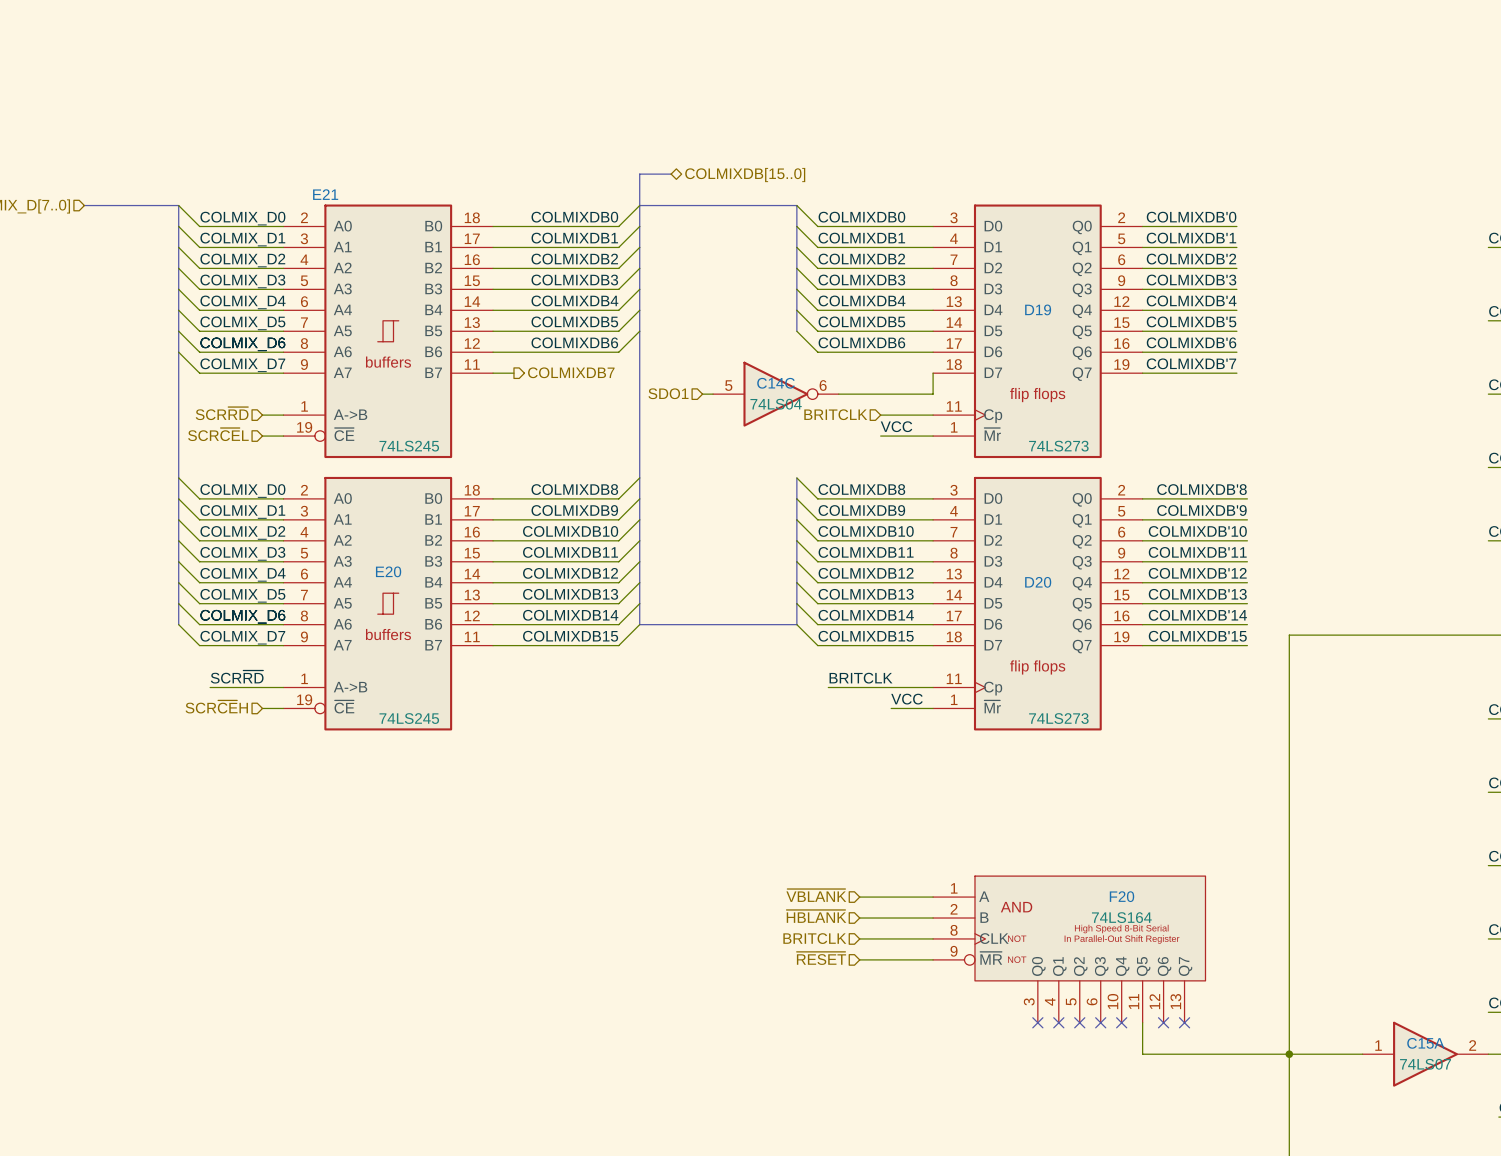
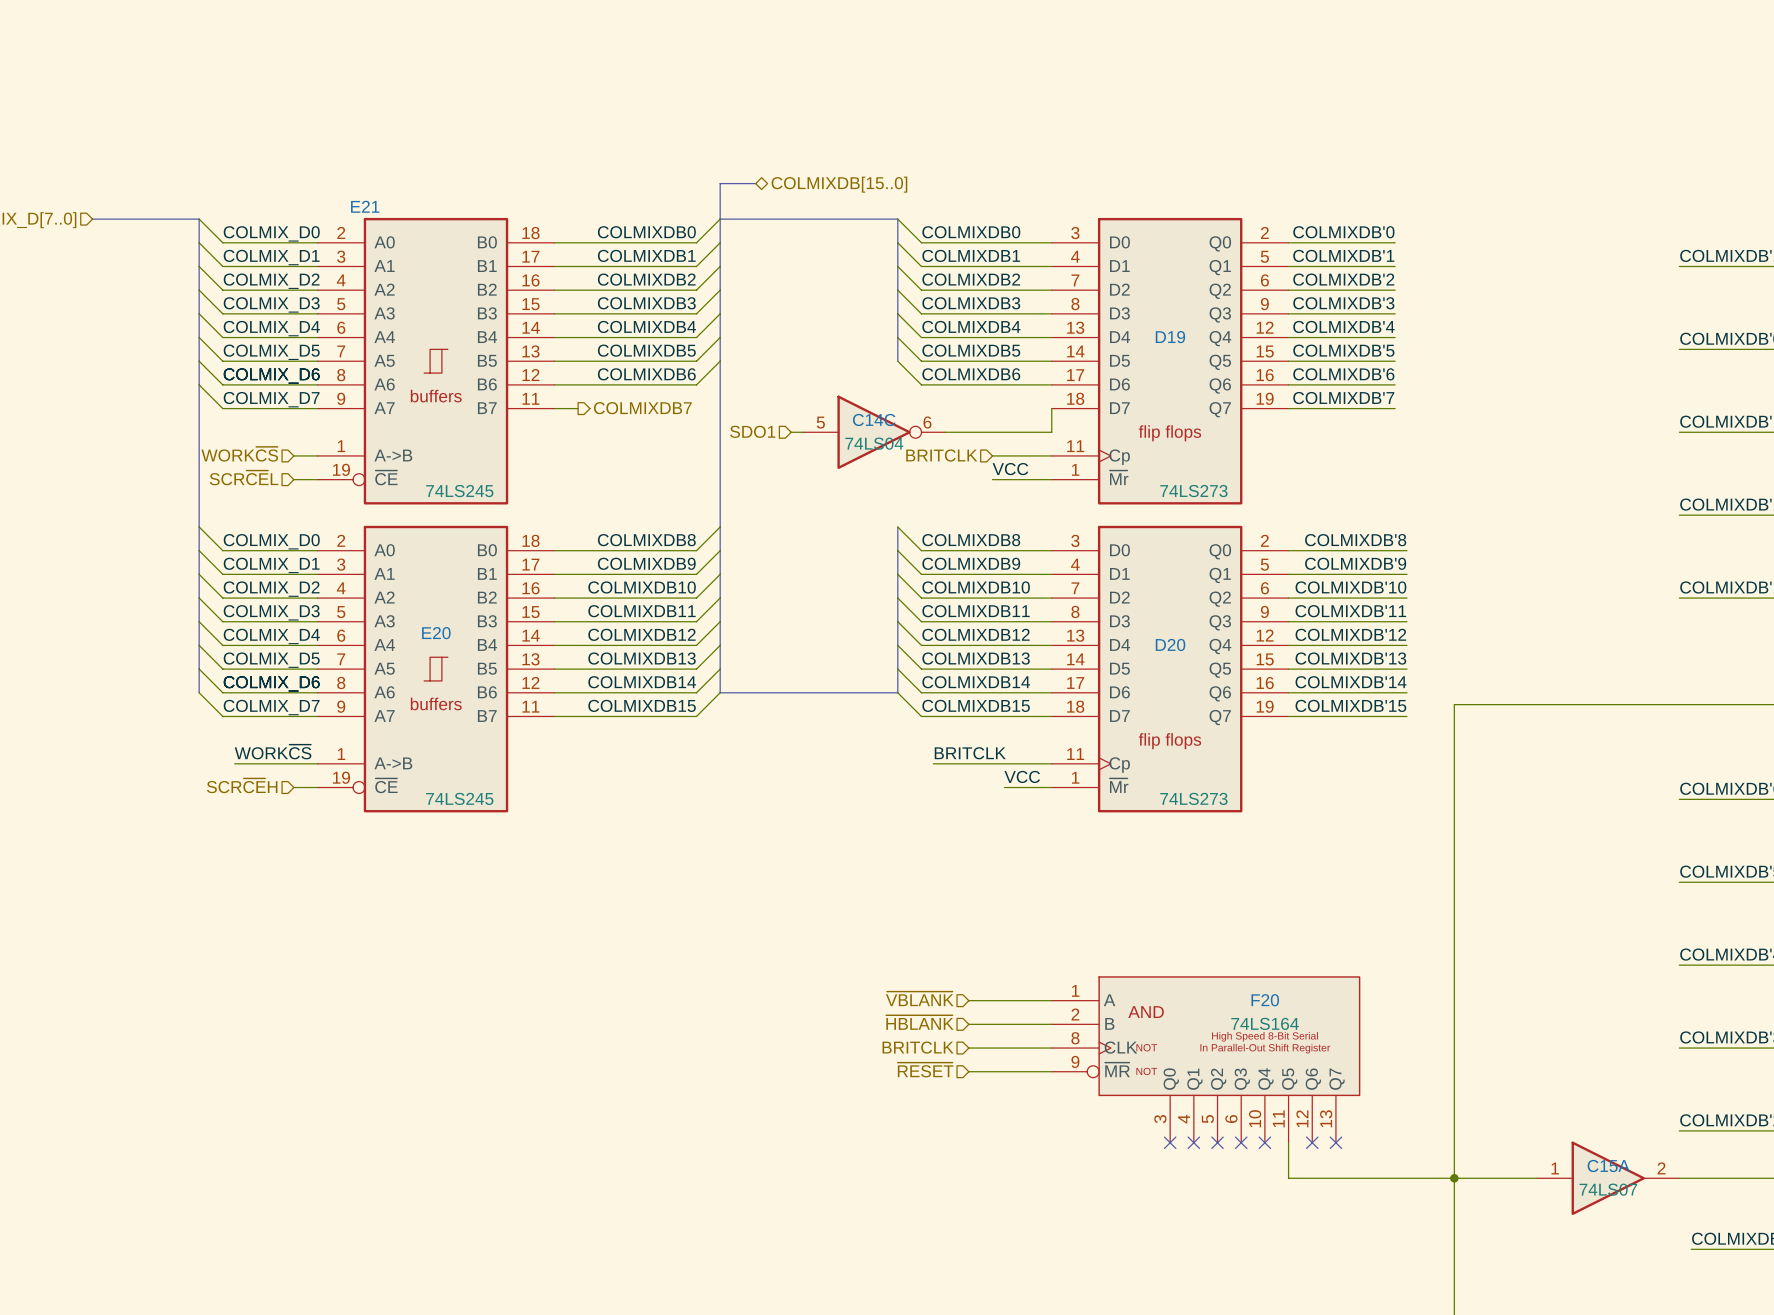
hierarchical label: SCR~{RD} (222, 413) -> WORK~{CS} (239, 454)
label: SCR~{RD} (237, 677) -> WORK~{CS} (273, 751)

